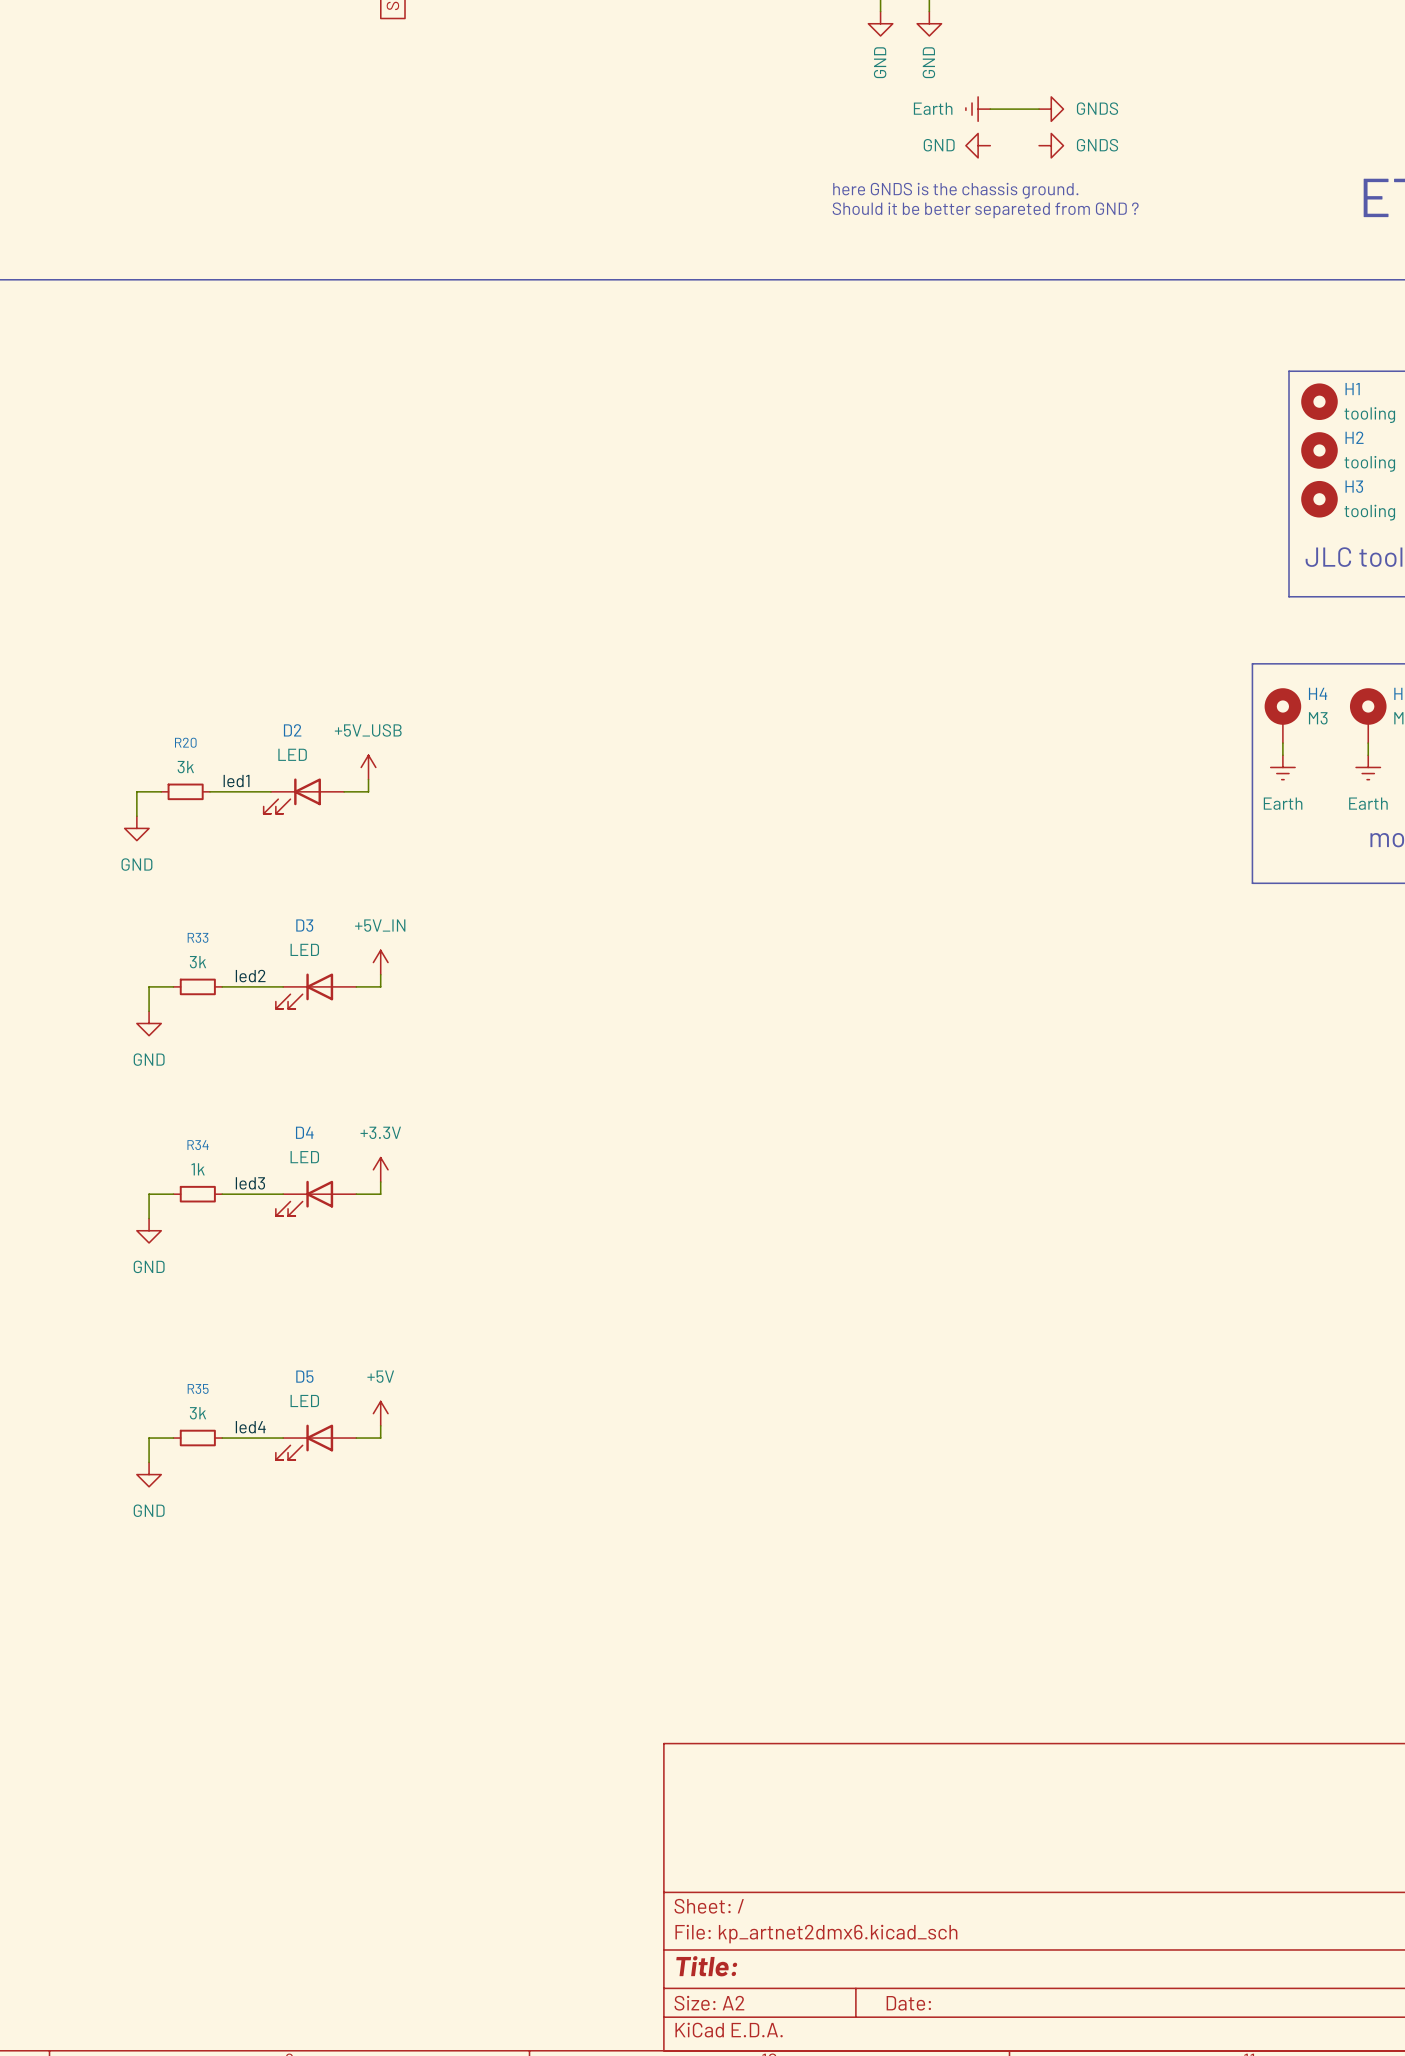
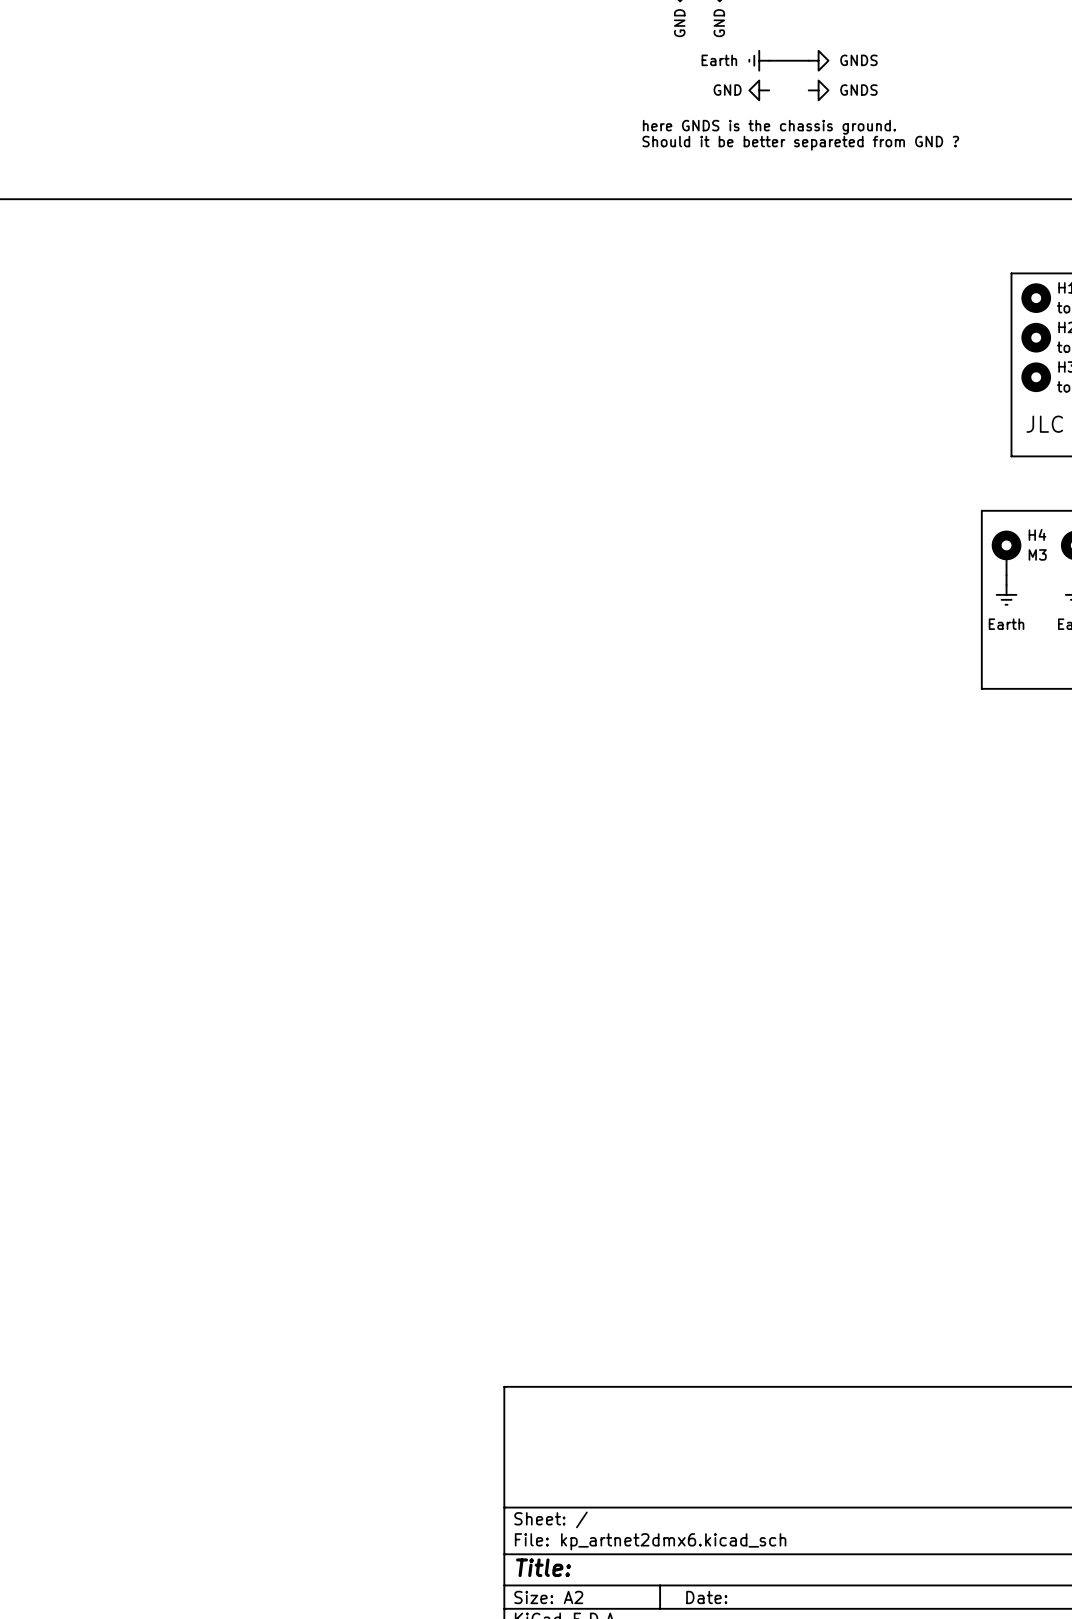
power symbol: +5V_USB (368, 767) -> none
wire: (368, 779) (368, 791) (344, 791) -> none
label: led1 (236, 781) -> none
wire: (161, 791) (136, 791) (136, 816) -> none
R20: 3k (185, 791) -> none
wire: (210, 791) (270, 791) -> none
D2: LED (303, 796) -> none
power symbol: GND (136, 828) -> none
power symbol: +5V_IN (380, 962) -> none
wire: (380, 974) (380, 986) (356, 986) -> none
label: led2 (250, 976) -> none
wire: (173, 986) (149, 986) (149, 1011) -> none
R33: 3k (197, 986) -> none
wire: (222, 986) (283, 986) -> none
D3: LED (316, 991) -> none
power symbol: GND (149, 1023) -> none
power symbol: +3.3V (380, 1169) -> none
wire: (380, 1181) (380, 1194) (356, 1194) -> none
label: led3 (250, 1183) -> none
wire: (173, 1194) (149, 1194) (149, 1218) -> none
R34: 1k (197, 1194) -> none
wire: (222, 1194) (283, 1194) -> none
D4: LED (316, 1198) -> none
power symbol: GND (149, 1230) -> none
power symbol: +5V (380, 1413) -> none
wire: (380, 1425) (380, 1438) (356, 1438) -> none
label: led4 (250, 1427) -> none
wire: (173, 1438) (149, 1438) (149, 1462) -> none
R35: 3k (197, 1438) -> none
wire: (222, 1438) (283, 1438) -> none
D5: LED (316, 1442) -> none
power symbol: GND (149, 1474) -> none

